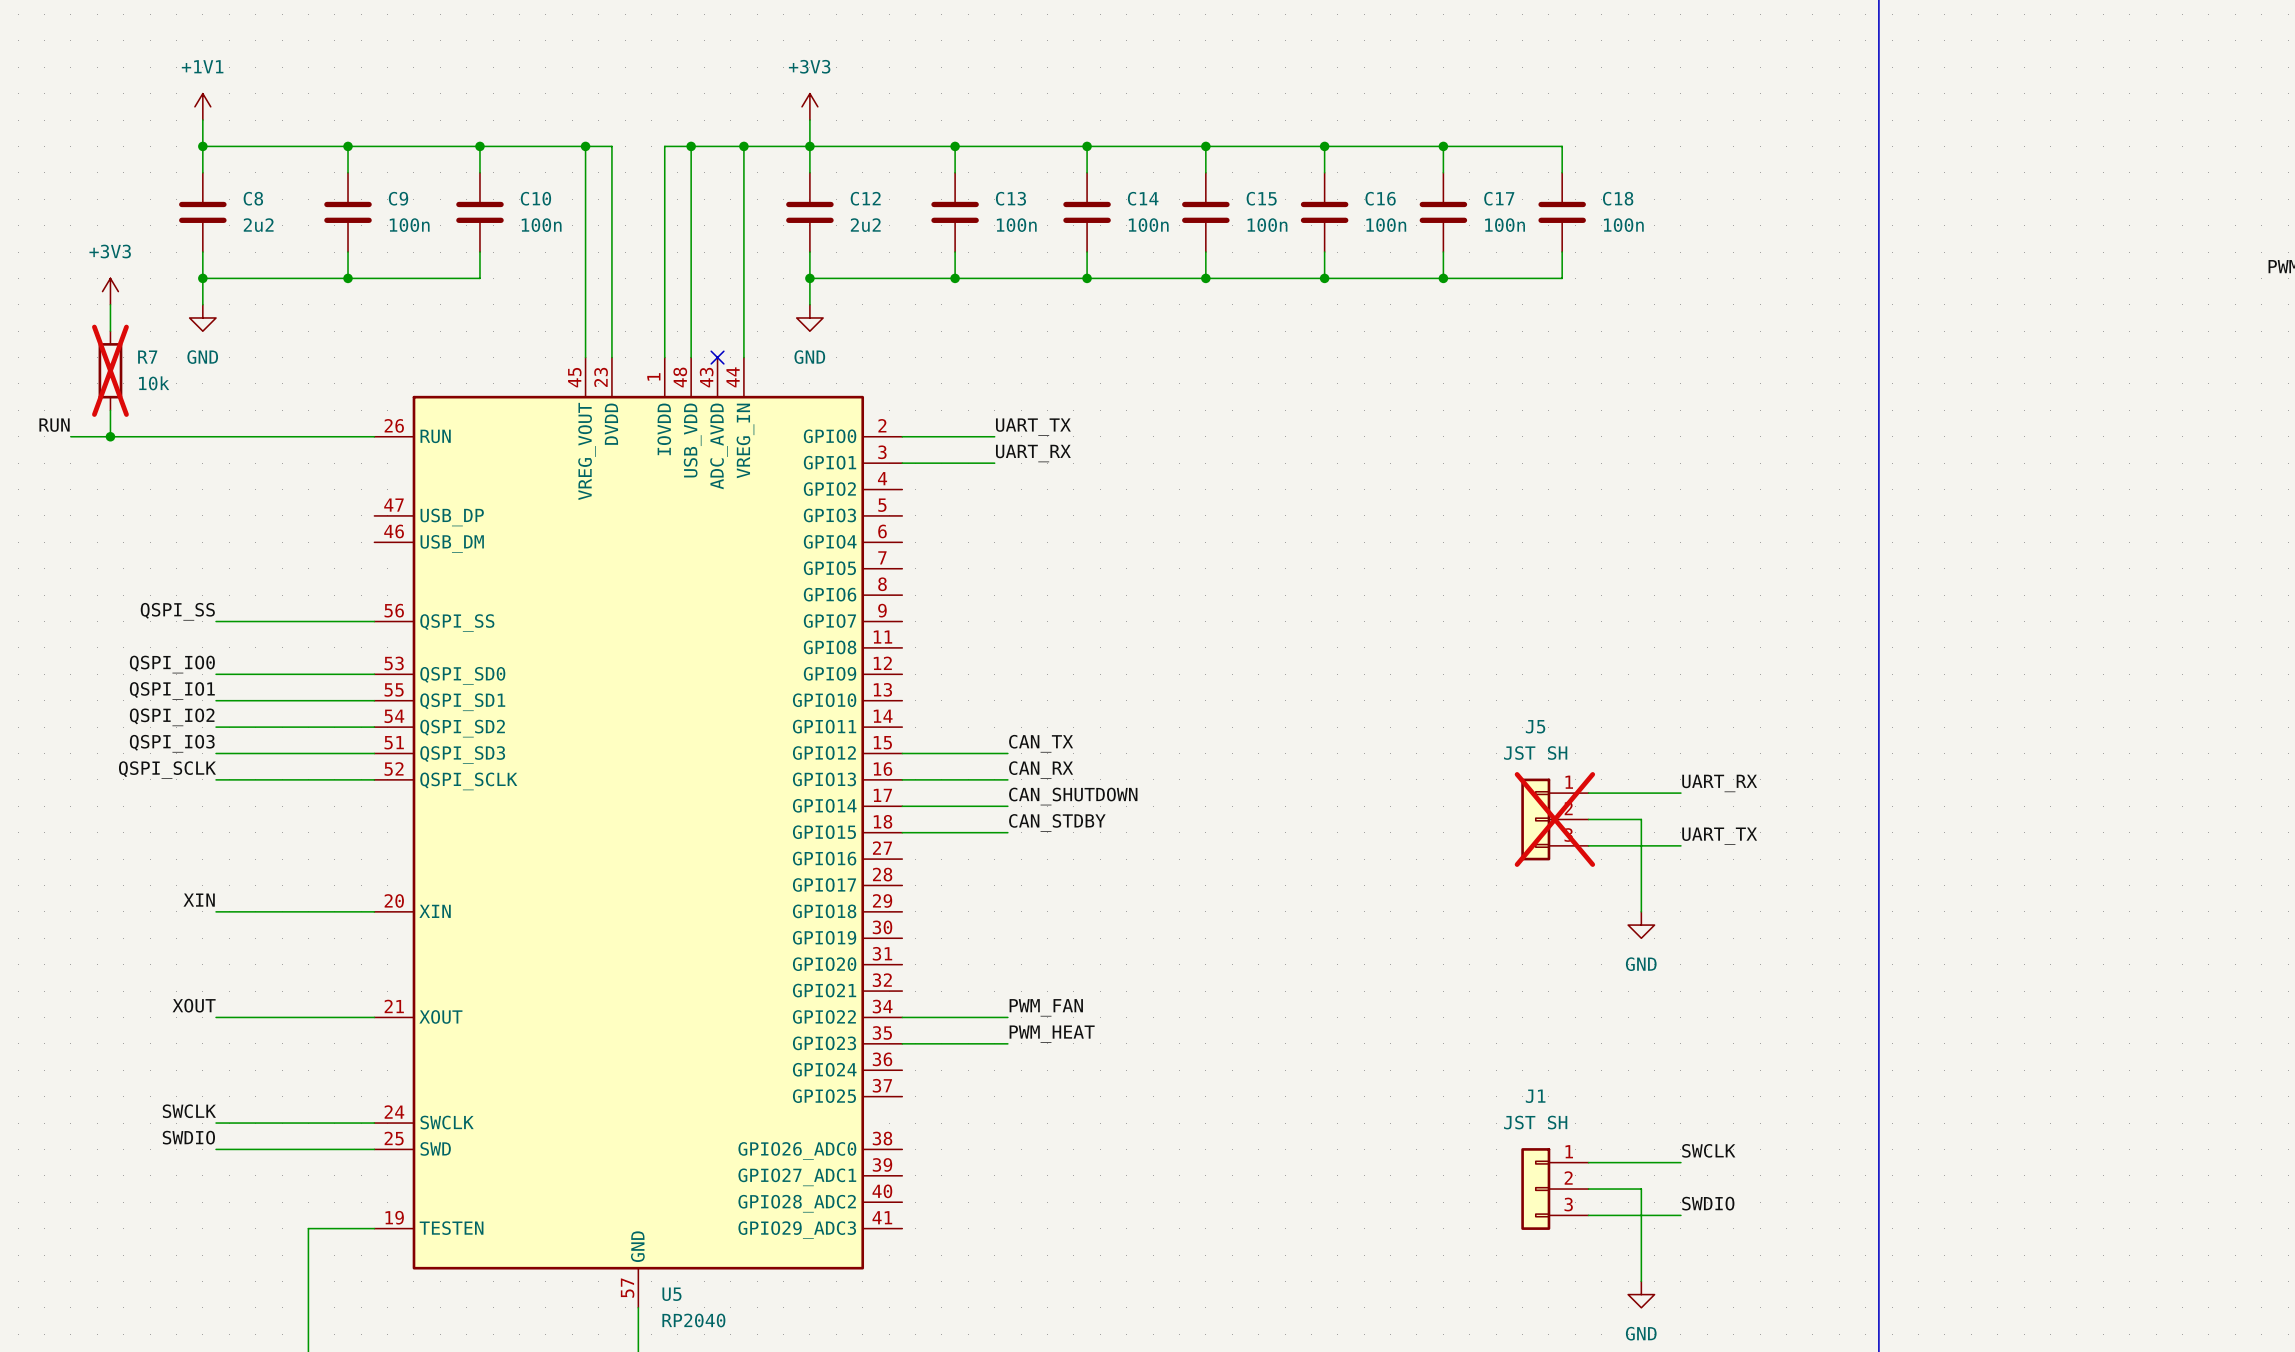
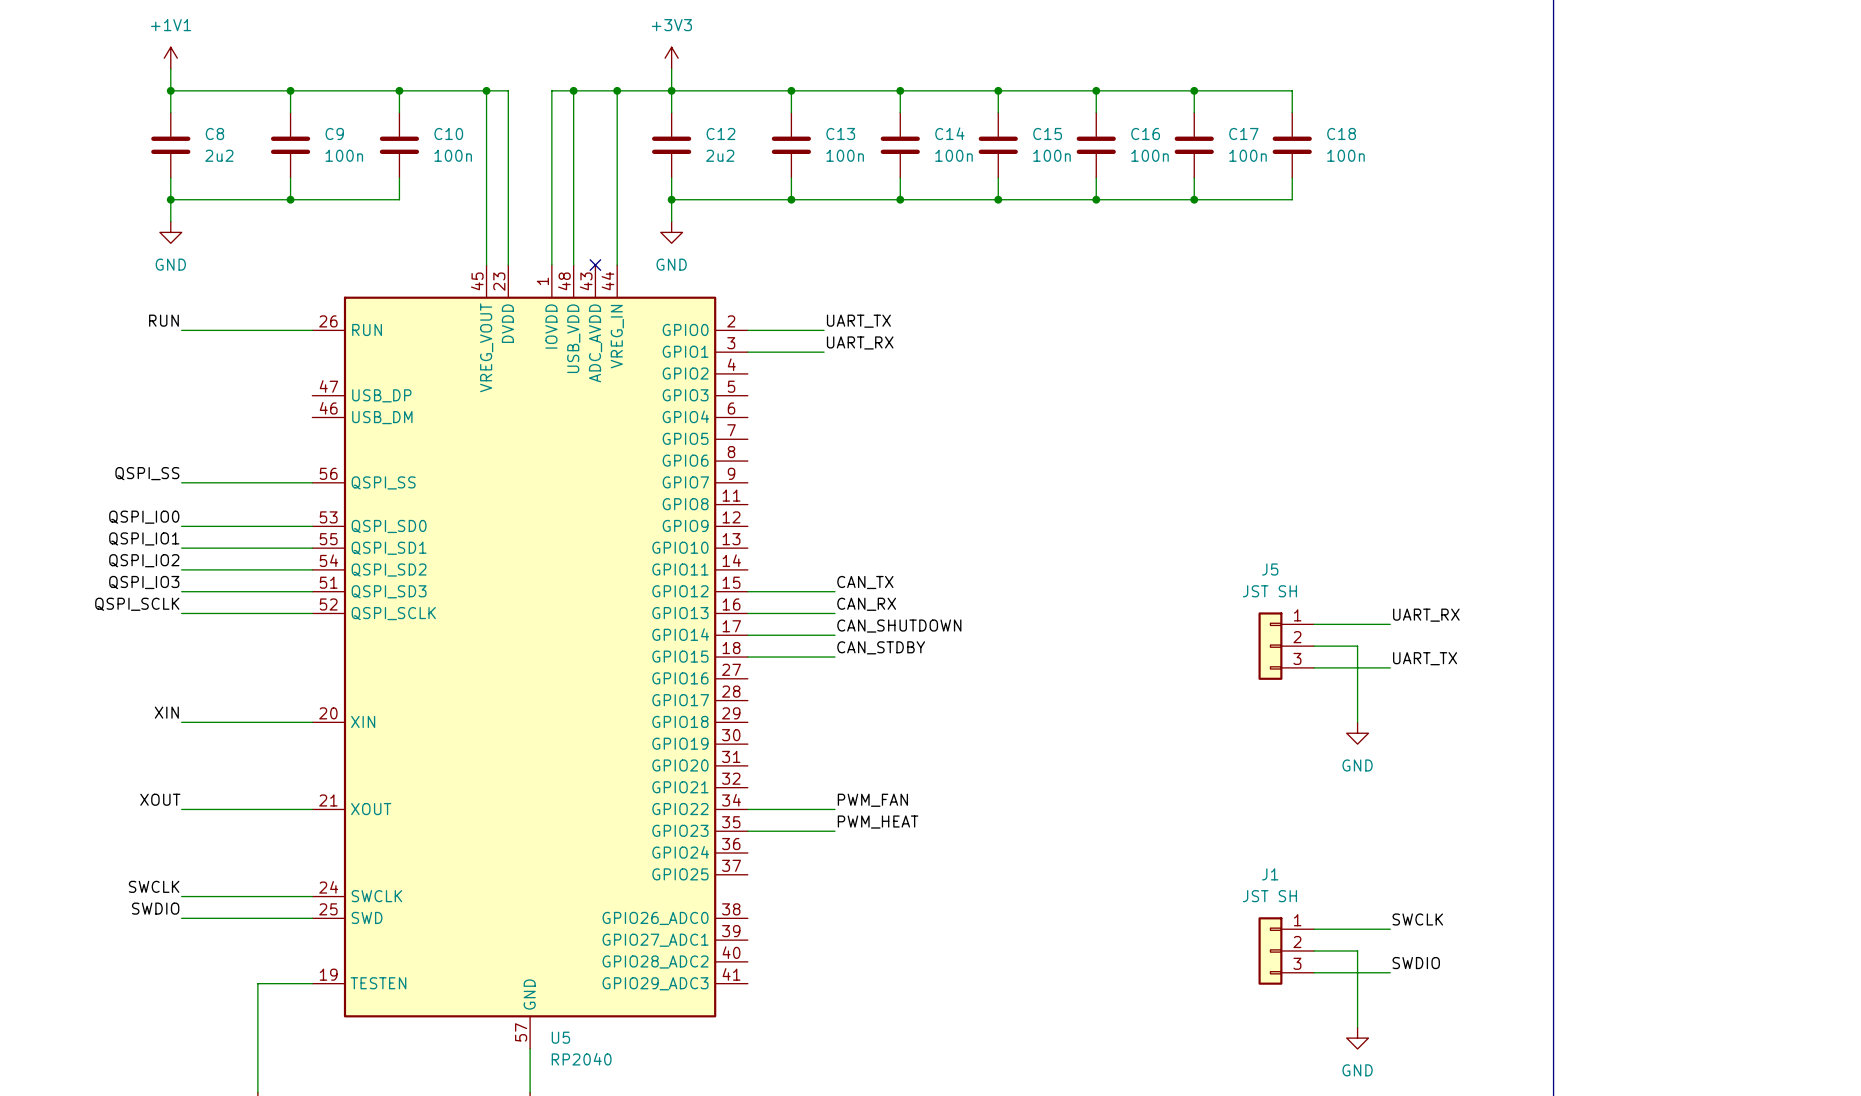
power symbol: +3V3 (110, 291) -> none
wire: (110, 304) (110, 331) -> none
R7: 10k (110, 370) -> none
wire: (110, 410) (110, 436) -> none
label position: RUN (54, 425) -> RUN (163, 320)
wire: (70, 436) (216, 436) -> none
junction: (110, 436) -> none
J5 do-not-place cross: (1554, 819) -> none

